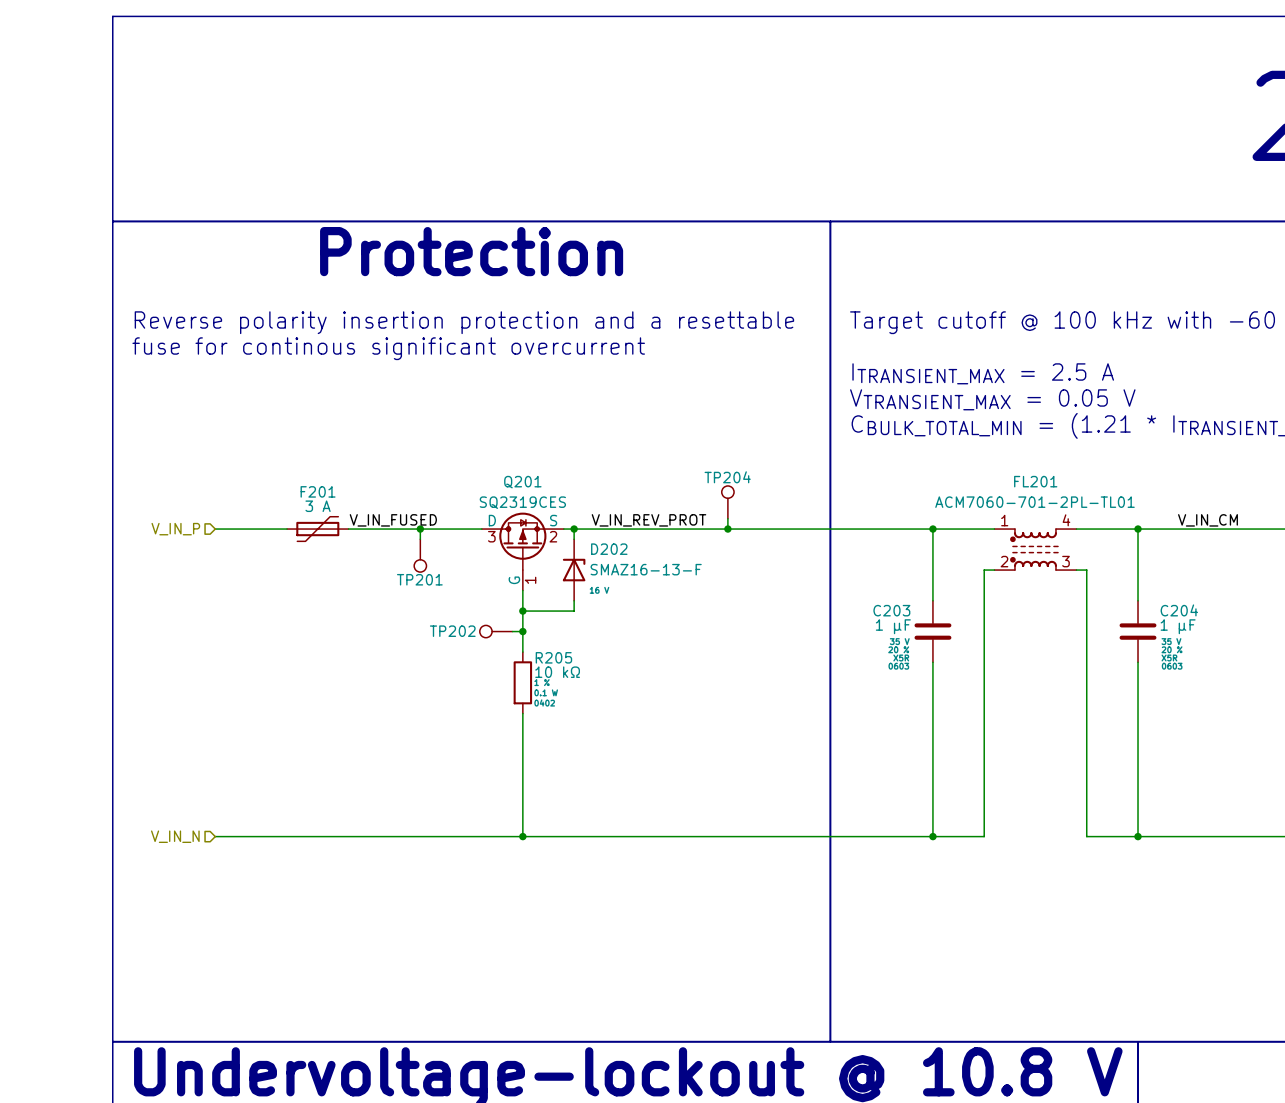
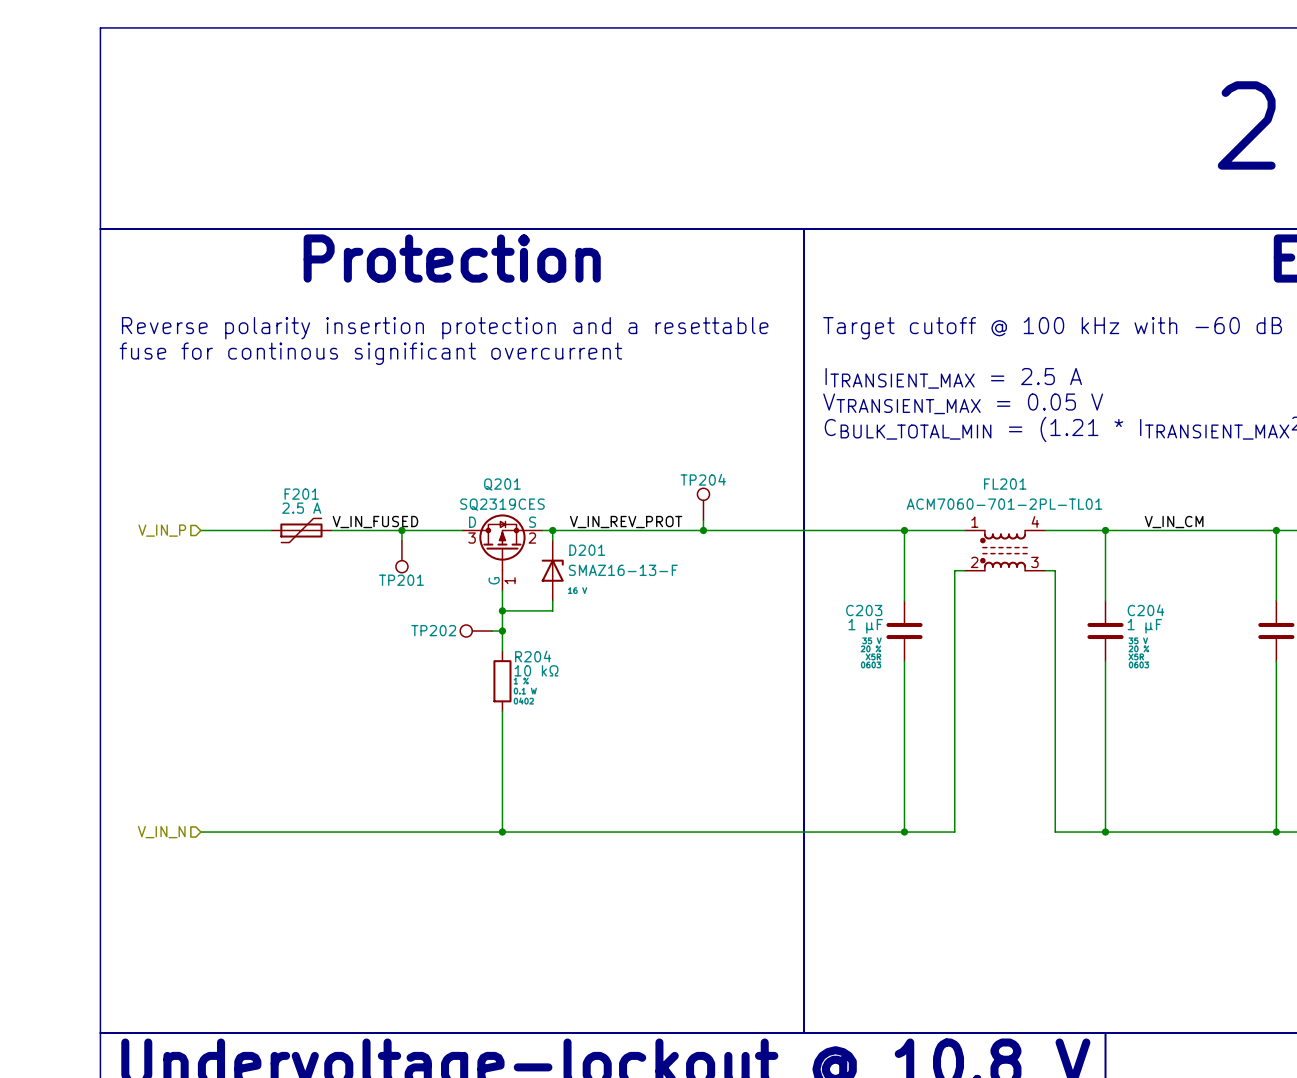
F201 value: 3 A (318, 506) -> 2.5 A (301, 508)
D202 name: D202 (609, 549) -> D201 (587, 550)
R205 name: R205 (553, 657) -> R204 (533, 656)

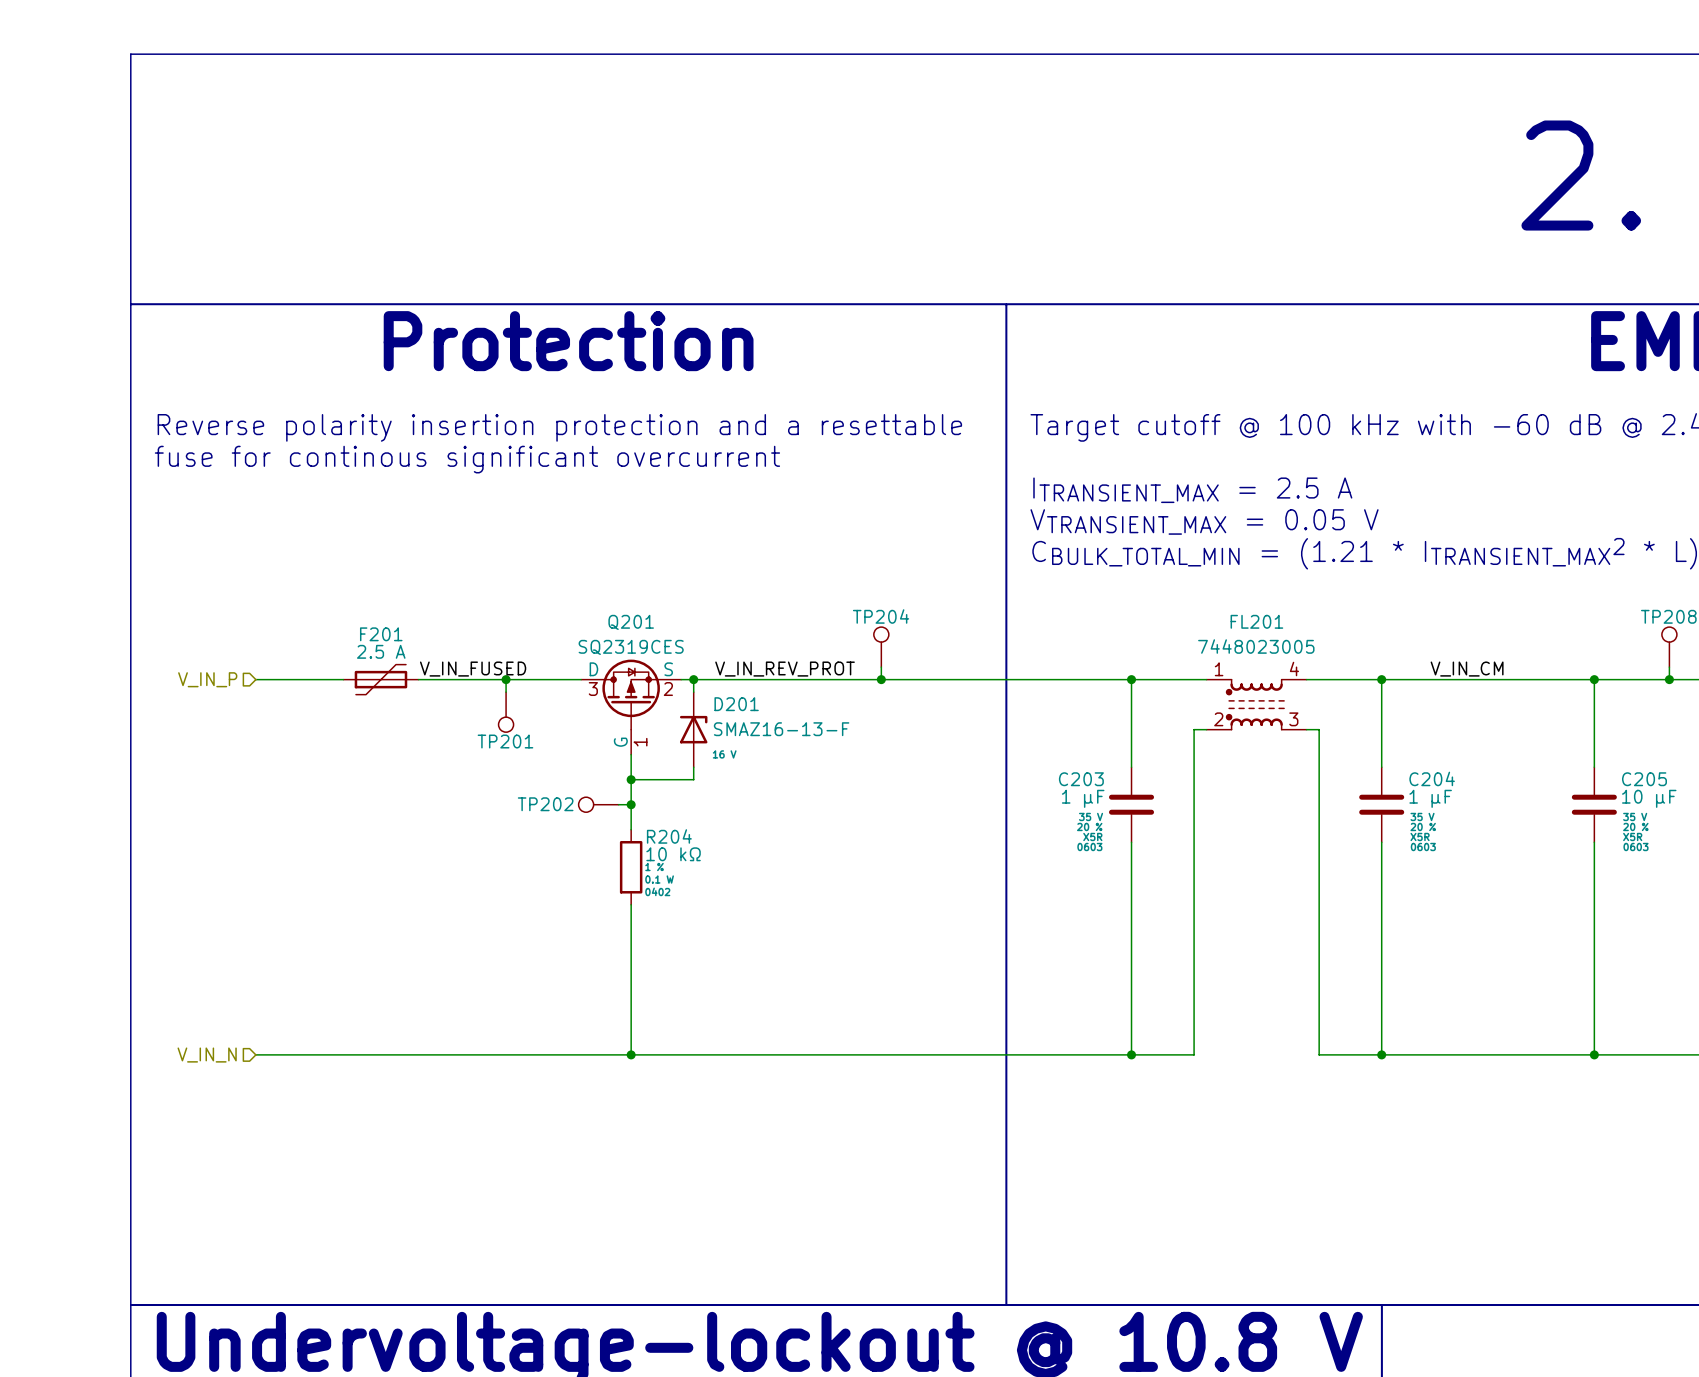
FL201 value: ACM7060-701-2PL-TL01 (1004, 504) -> 7448023005 (1256, 646)

